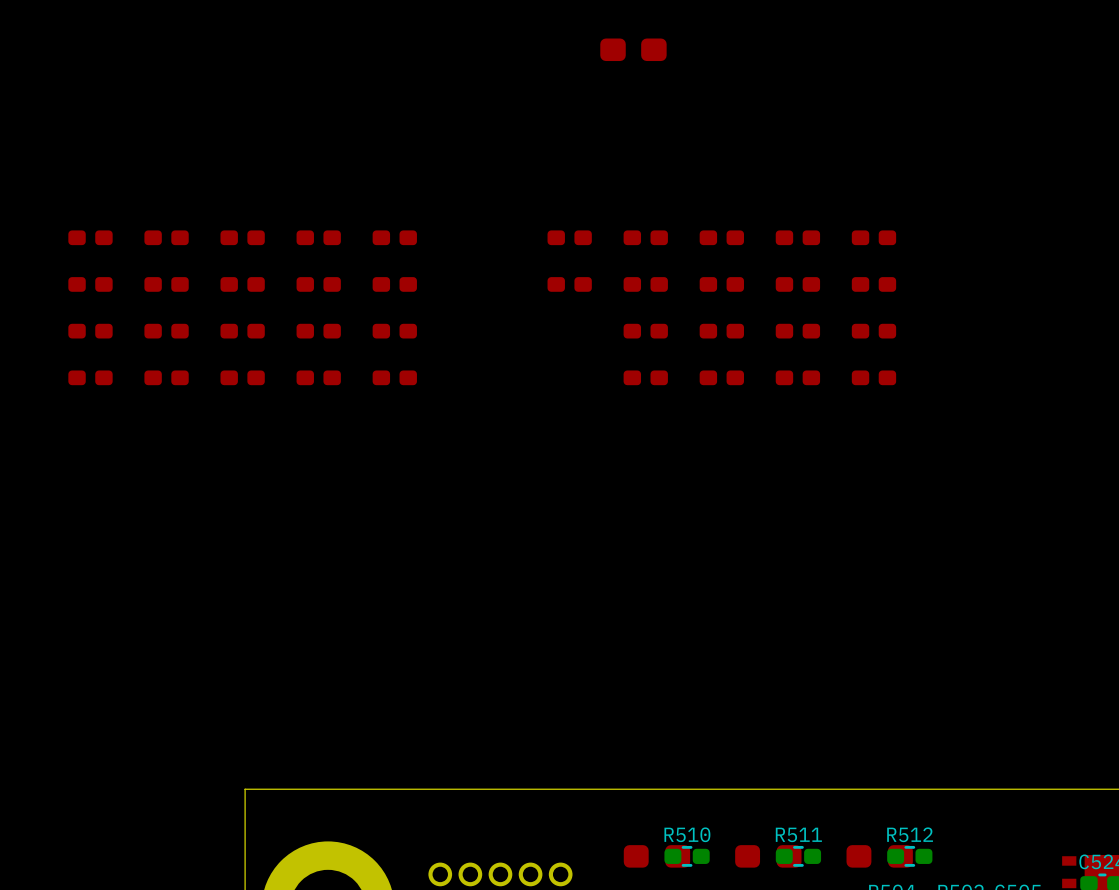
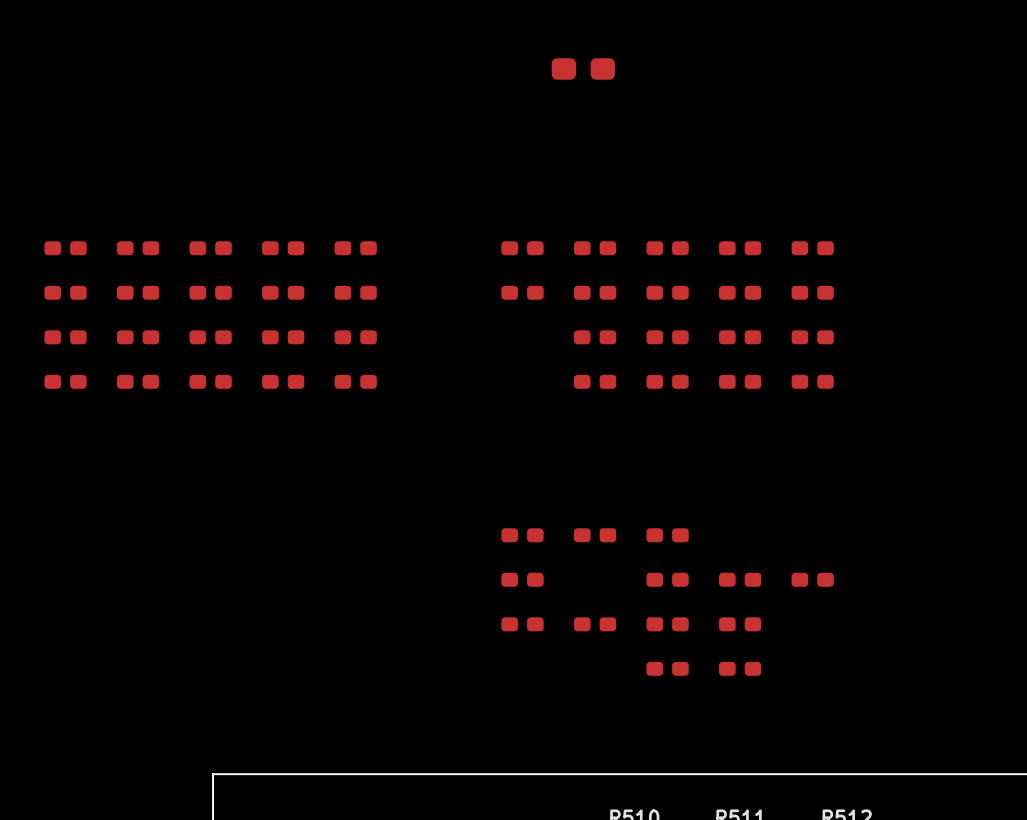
part: none -> (522, 535)
part: none -> (595, 535)
part: none -> (667, 535)
part: none -> (522, 579)
part: none -> (667, 579)
part: none -> (740, 579)
part: none -> (812, 579)
part: none -> (522, 624)
part: none -> (595, 624)
part: none -> (667, 624)
part: none -> (740, 624)
part: none -> (667, 668)
part: none -> (740, 668)

